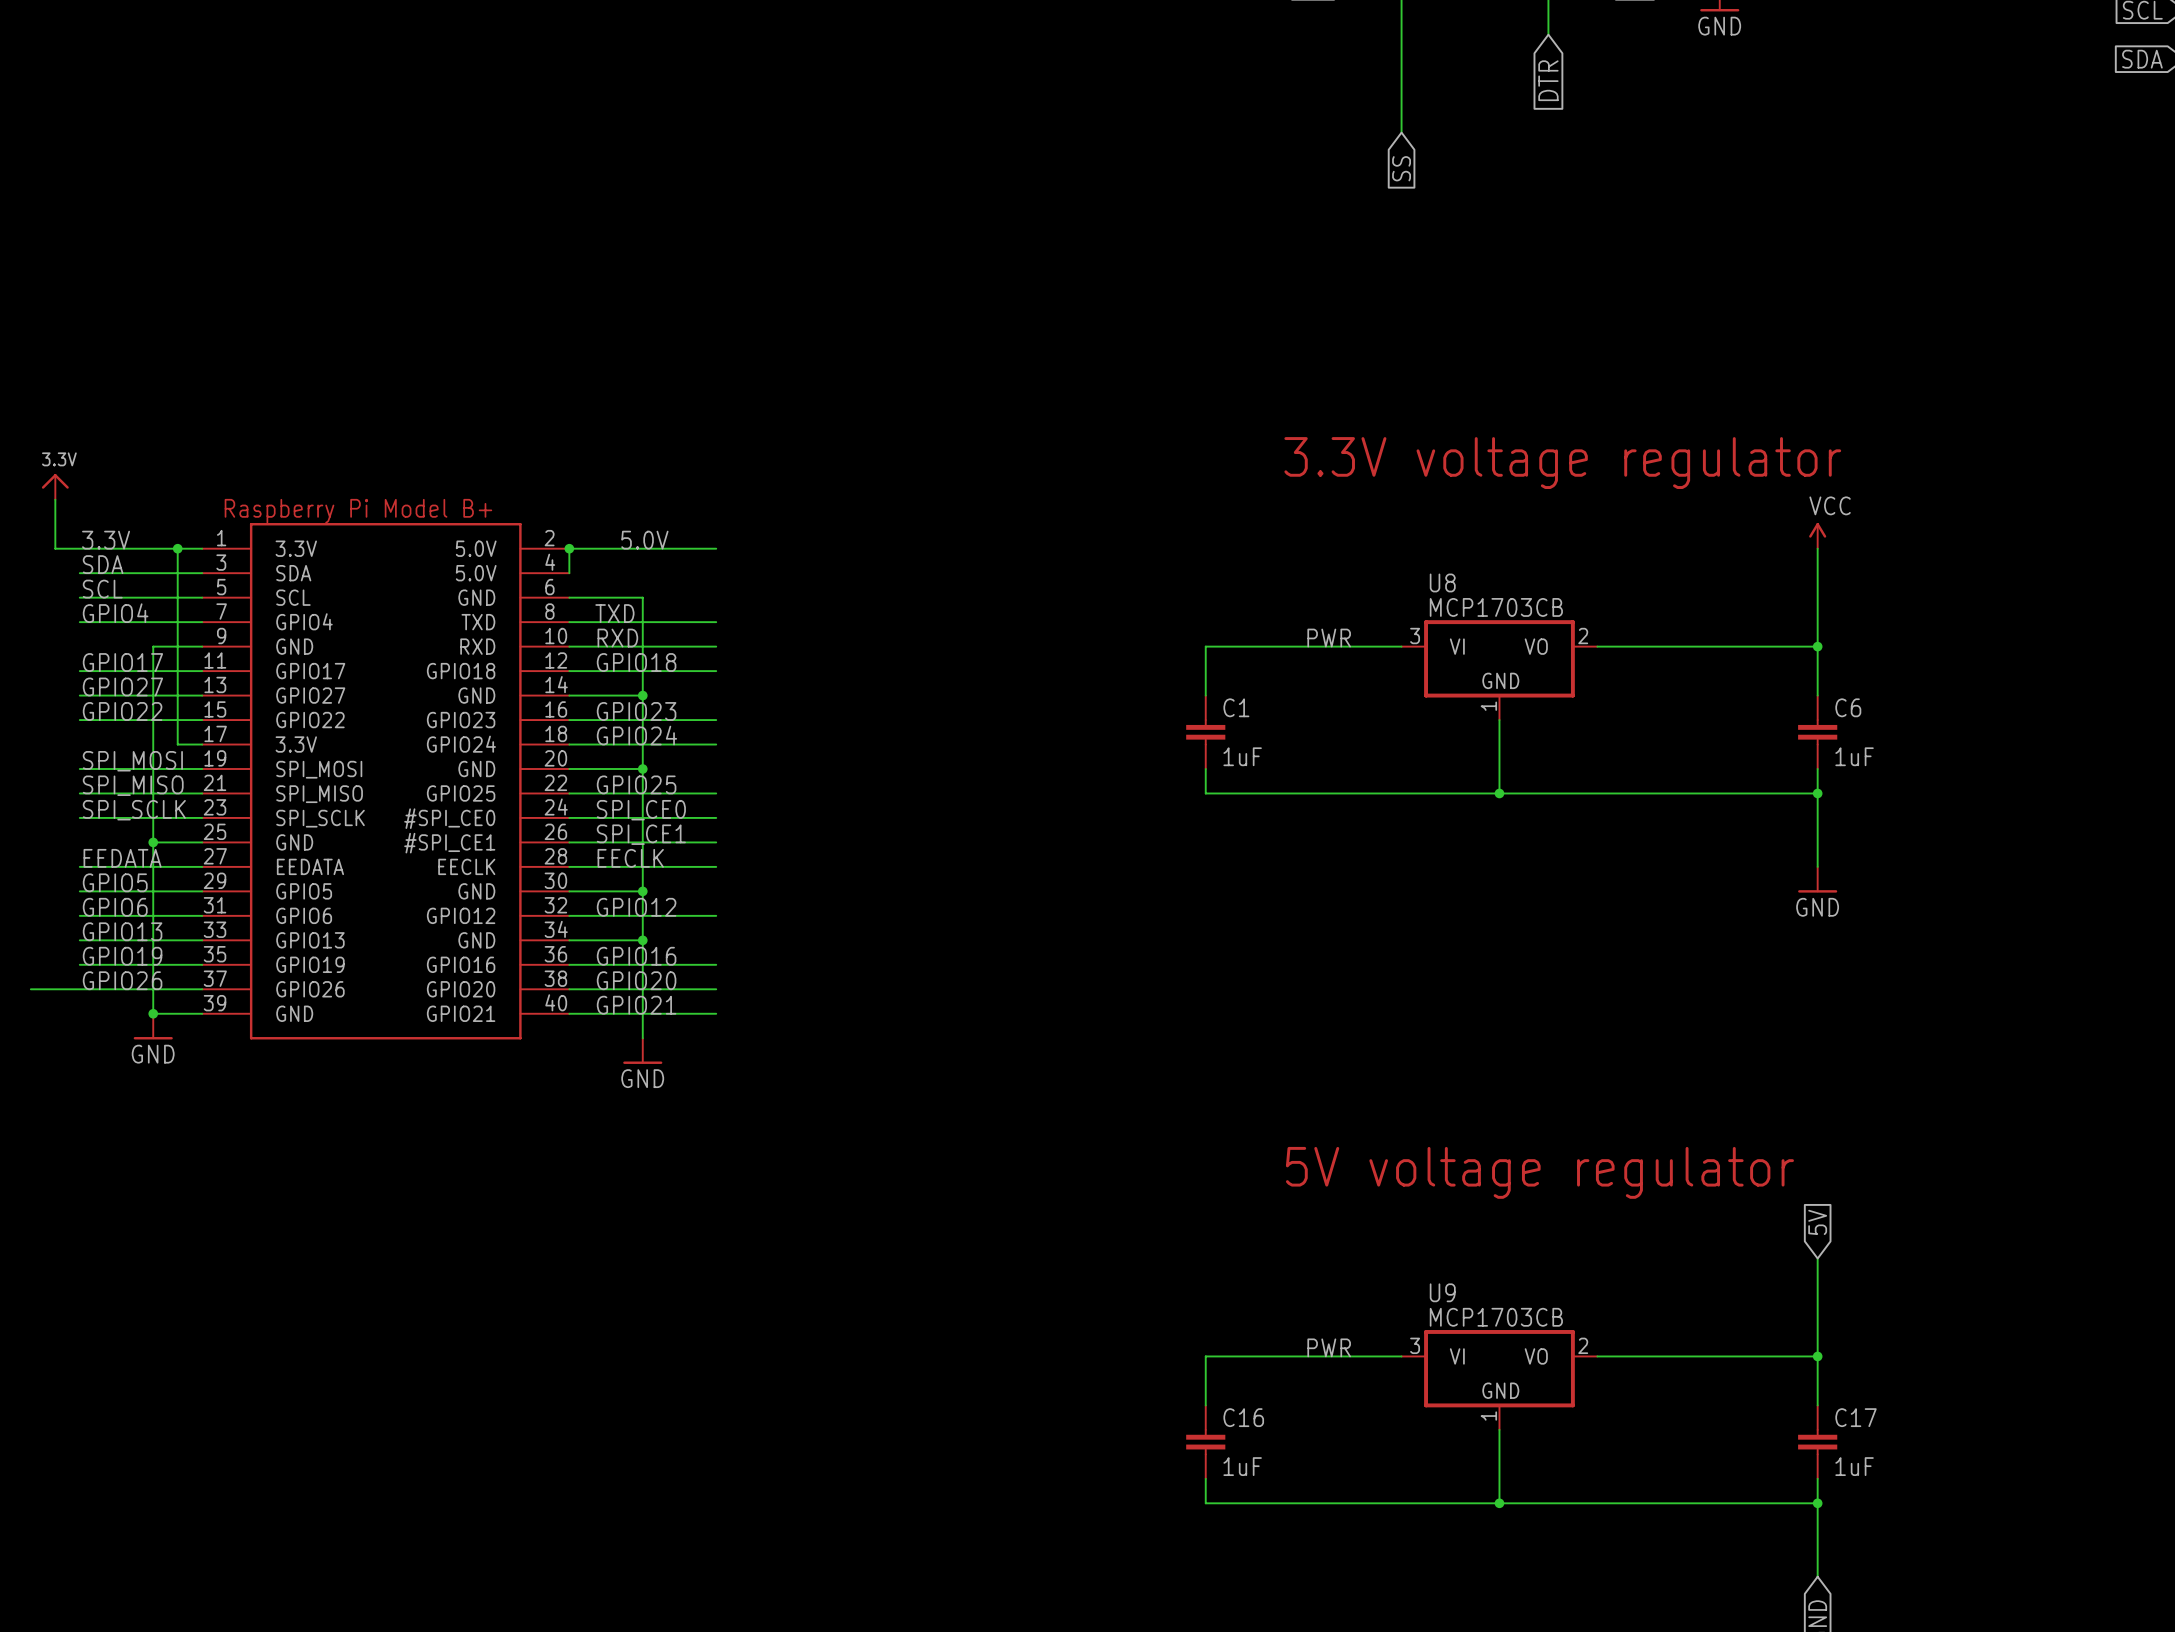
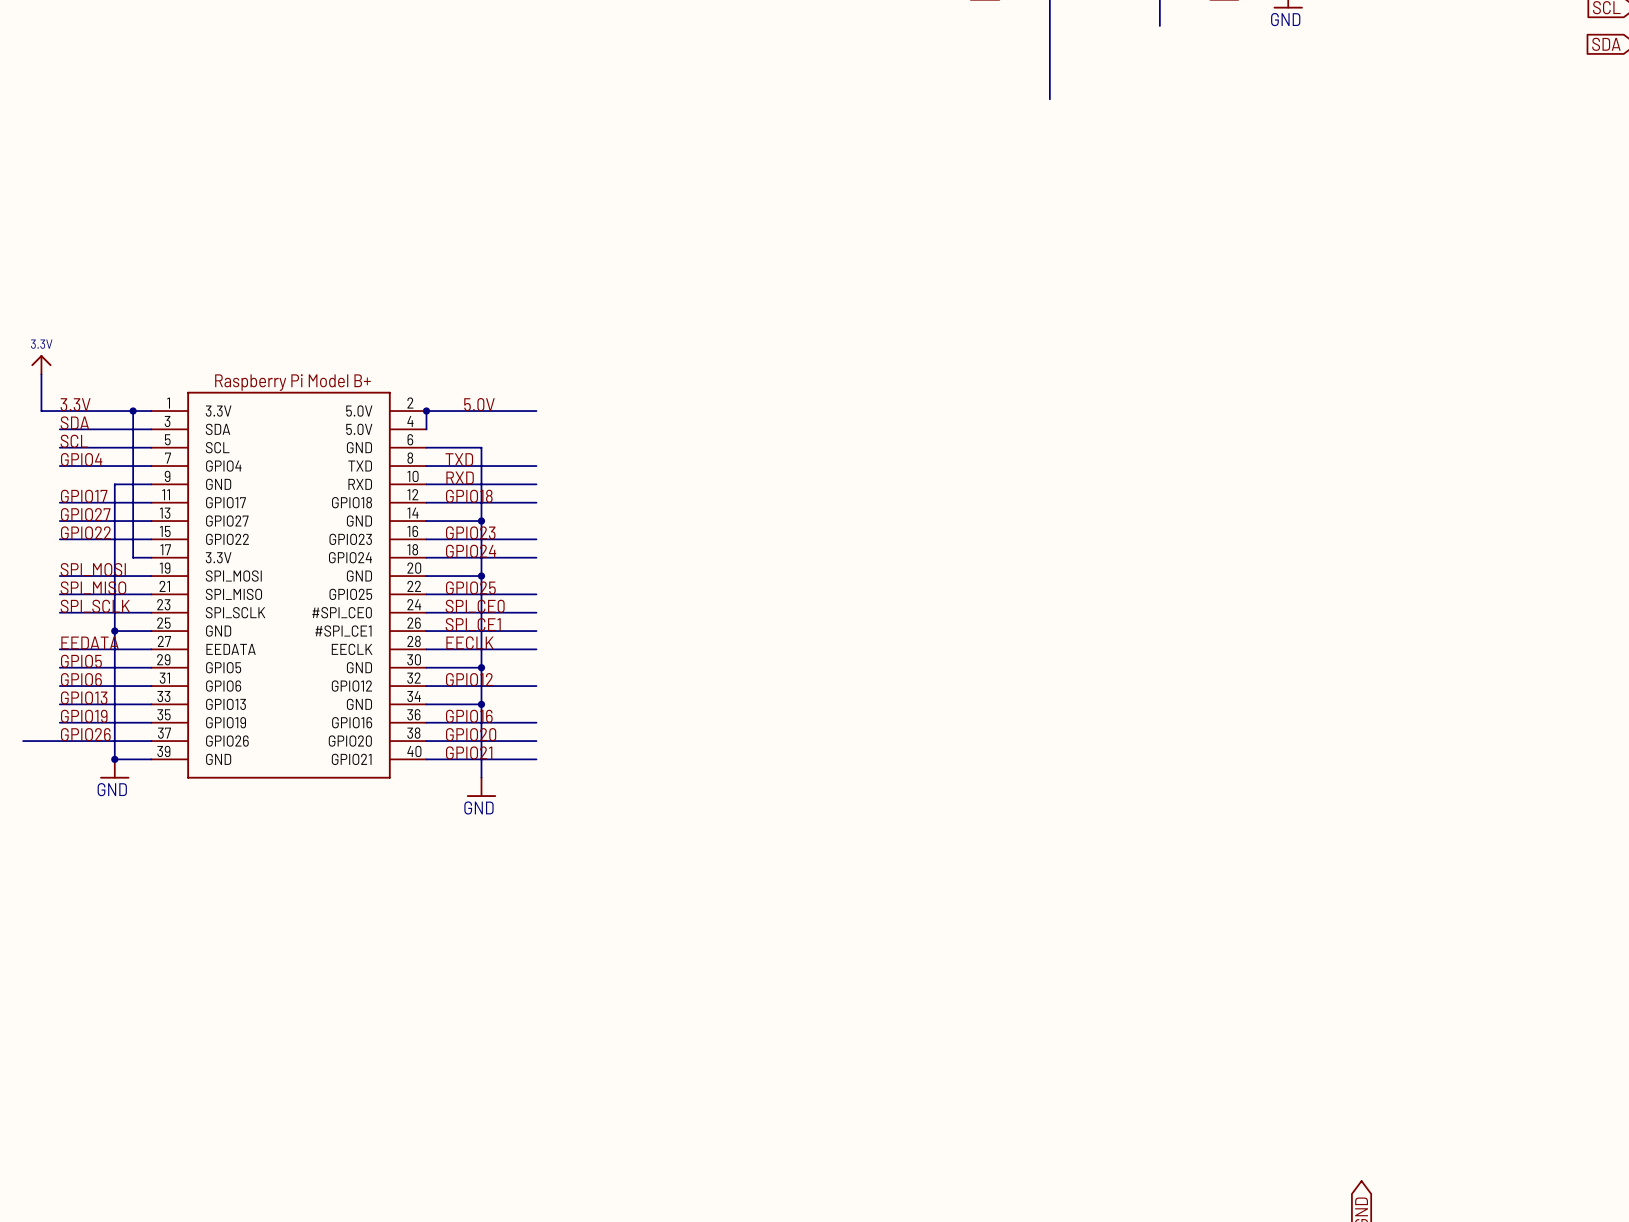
global label: DTR (1548, 80) -> none
global label: SS (1401, 168) -> none
text: 3.3V voltage regulator (1562, 463) -> none
power symbol: VCC (1817, 535) -> none
wire: (1817, 548) (1817, 695) -> none
label: PWR (1329, 638) -> none
wire: (1401, 646) (1205, 646) (1205, 695) -> none
wire: (1597, 646) (1817, 646) -> none
junction: (1817, 646) -> none
U8: MCP1703CB (1499, 670) -> none
wire: (1499, 720) (1499, 793) -> none
C1: 1uF (1205, 732) -> none
C6: 1uF (1817, 732) -> none
wire: (1205, 769) (1205, 793) (1817, 793) -> none
wire: (1817, 769) (1817, 866) -> none
junction: (1499, 793) -> none
junction: (1817, 793) -> none
power symbol: GND (1817, 879) -> none
text: 5V voltage regulator (1539, 1172) -> none
global label: 5V (1817, 1222) -> none
wire: (1817, 1258) (1817, 1405) -> none
label: PWR (1329, 1347) -> none
wire: (1401, 1356) (1205, 1356) (1205, 1405) -> none
wire: (1597, 1356) (1817, 1356) -> none
junction: (1817, 1356) -> none
U9: MCP1703CB (1499, 1379) -> none
wire: (1499, 1429) (1499, 1503) -> none
C16: 1uF (1205, 1442) -> none
C17: 1uF (1817, 1442) -> none
wire: (1205, 1478) (1205, 1503) (1817, 1503) -> none
wire: (1817, 1478) (1817, 1576) -> none
junction: (1499, 1503) -> none
junction: (1817, 1503) -> none

